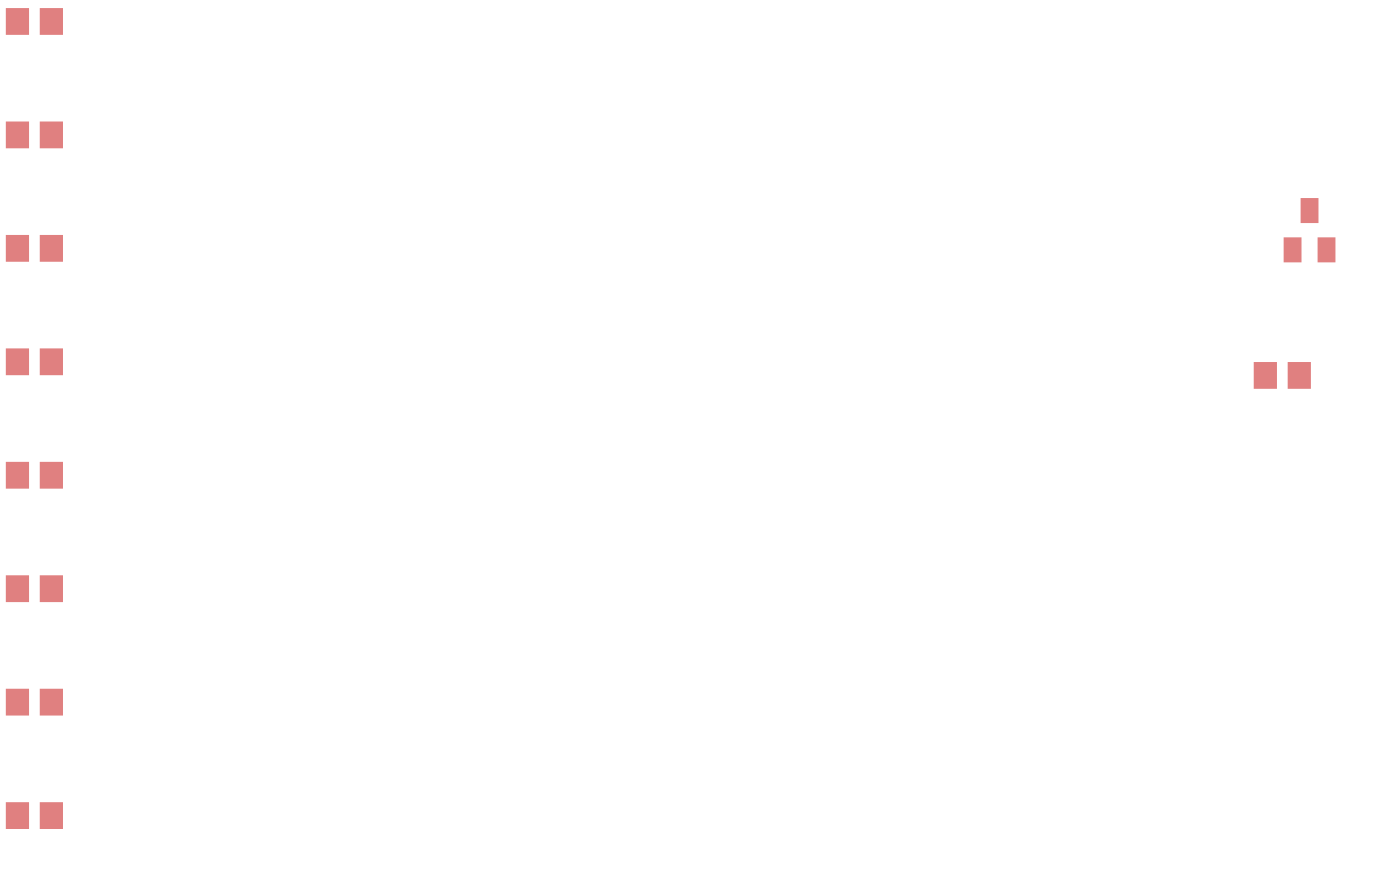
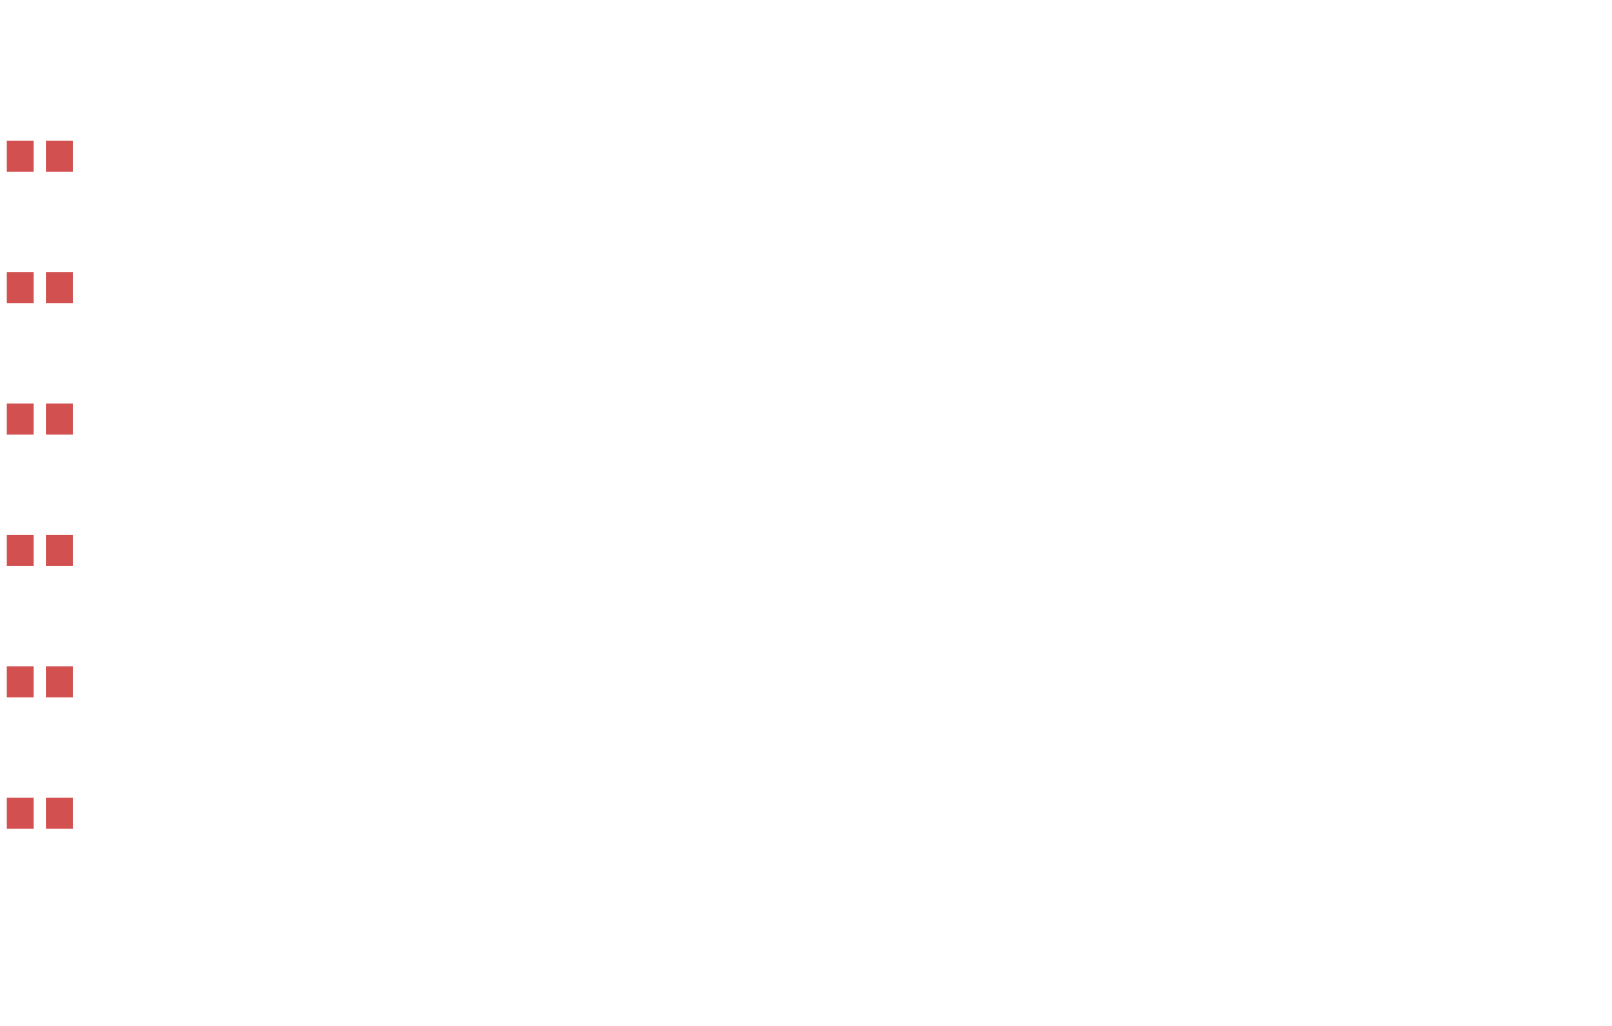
part: (34, 21) -> none
part: (1309, 230) -> none
part: (1282, 375) -> none
part: (34, 815) -> none

